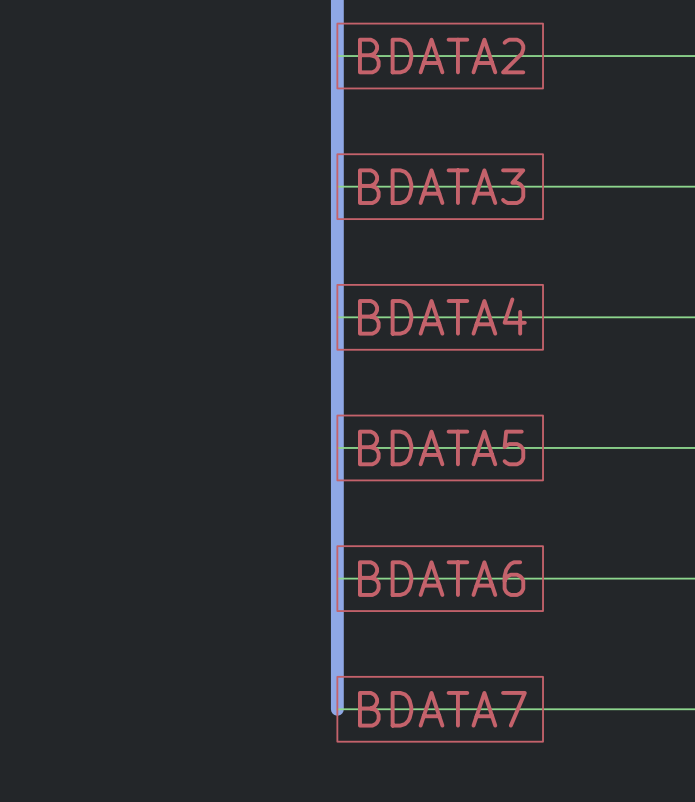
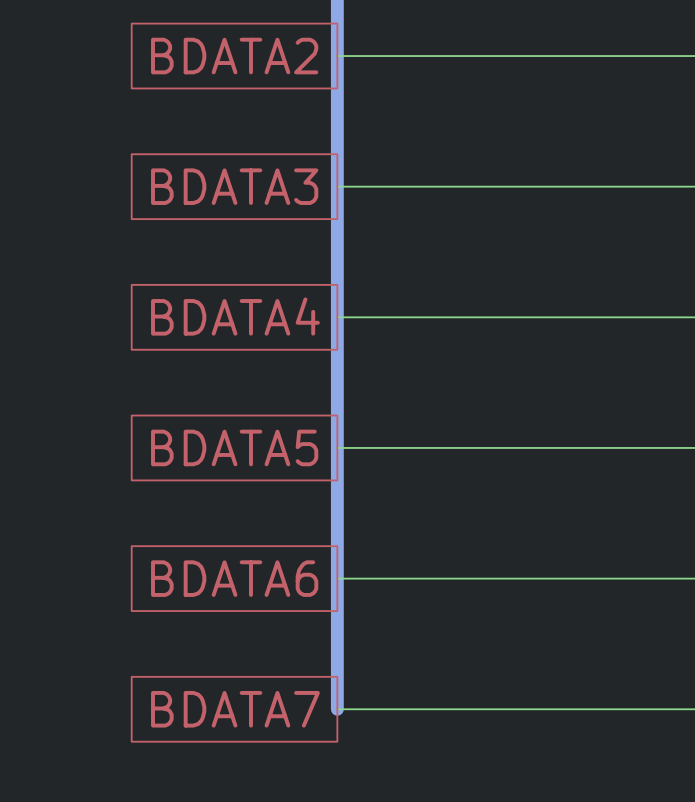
global label rotation: 0° (441, 56) -> 180° (234, 56)
global label rotation: 0° (441, 186) -> 180° (234, 186)
global label rotation: 0° (442, 316) -> 180° (235, 316)
global label rotation: 0° (441, 447) -> 180° (234, 447)
global label rotation: 0° (441, 578) -> 180° (234, 578)
global label rotation: 0° (442, 709) -> 180° (235, 709)

